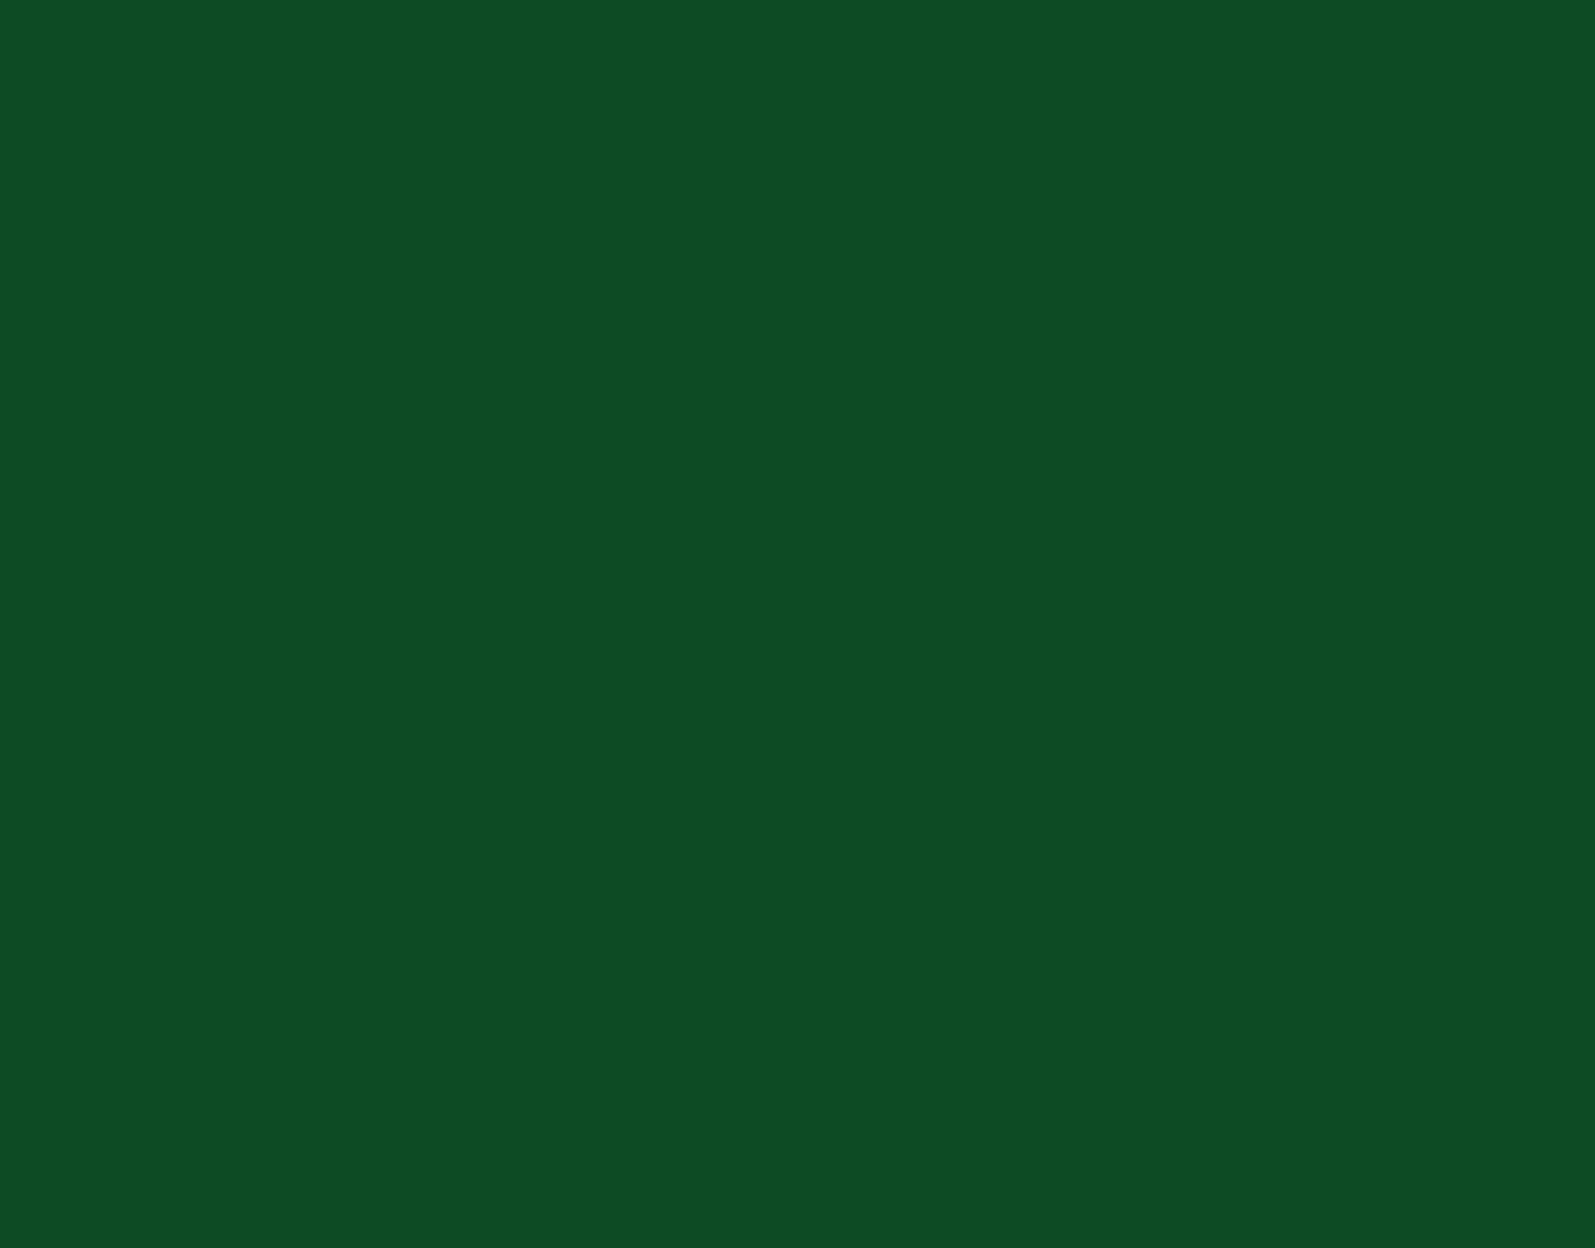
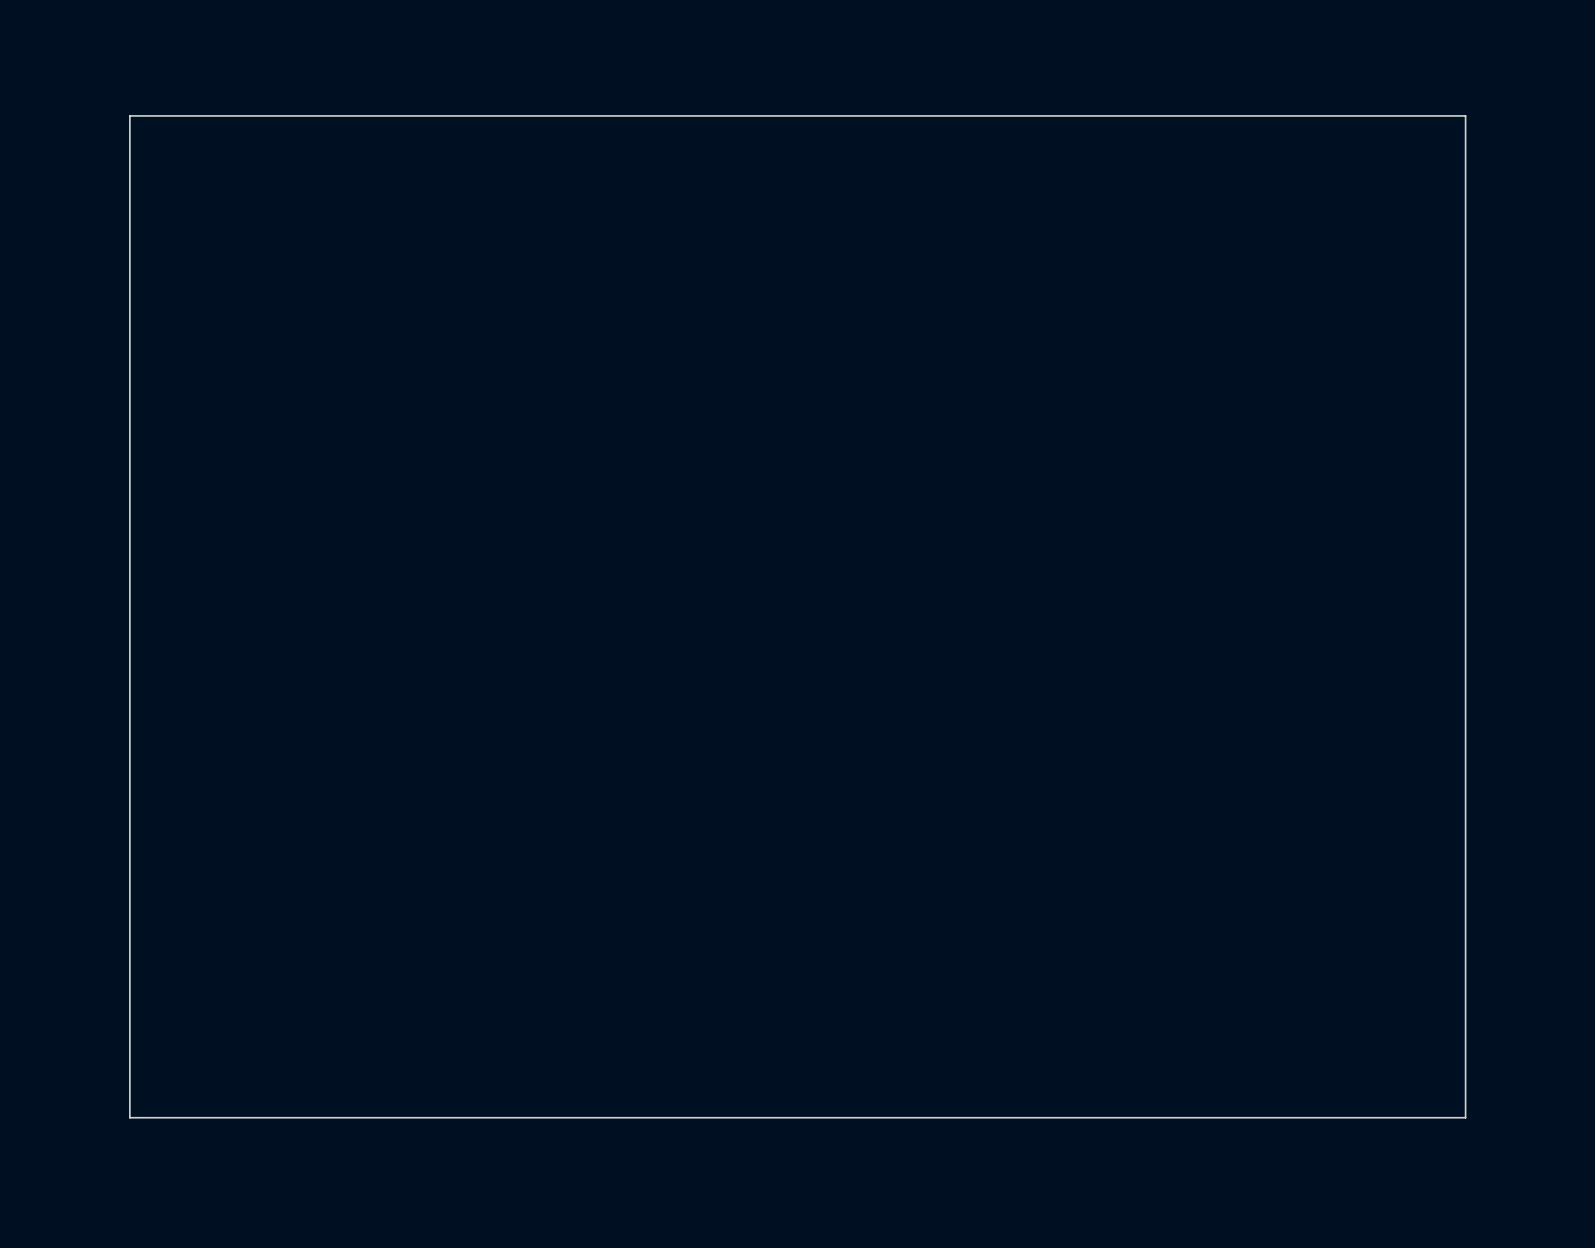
board edge: none -> (129, 115) (1465, 115) (1465, 1117) (129, 1117) (129, 115)

